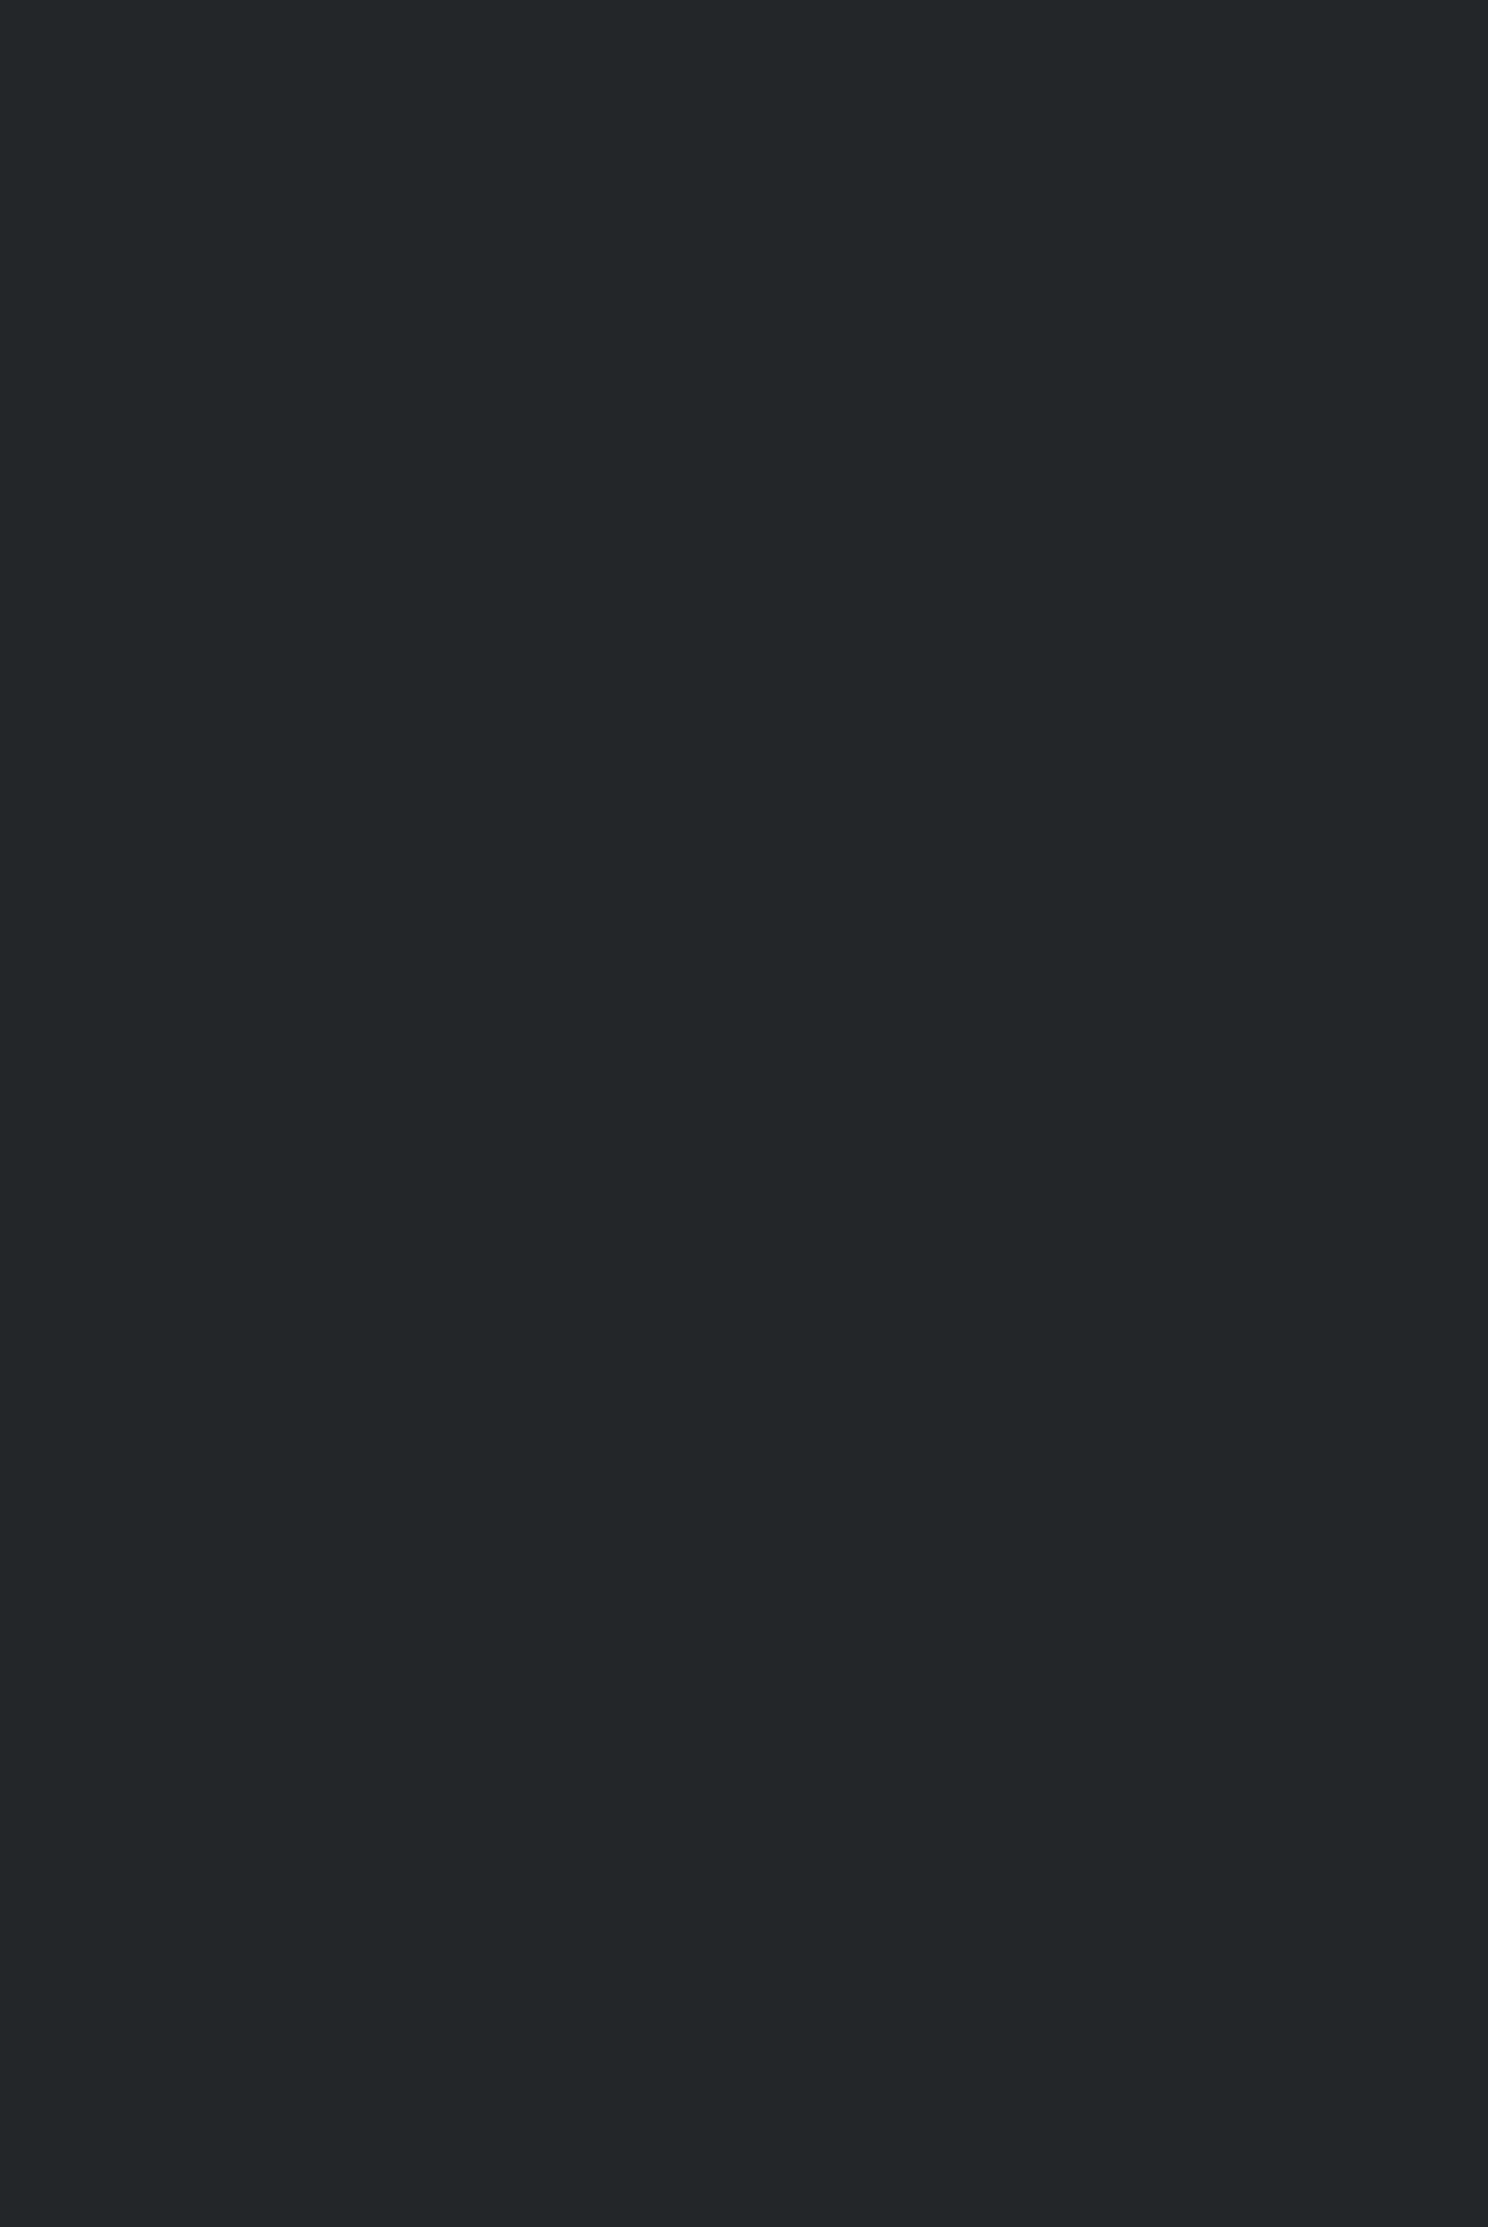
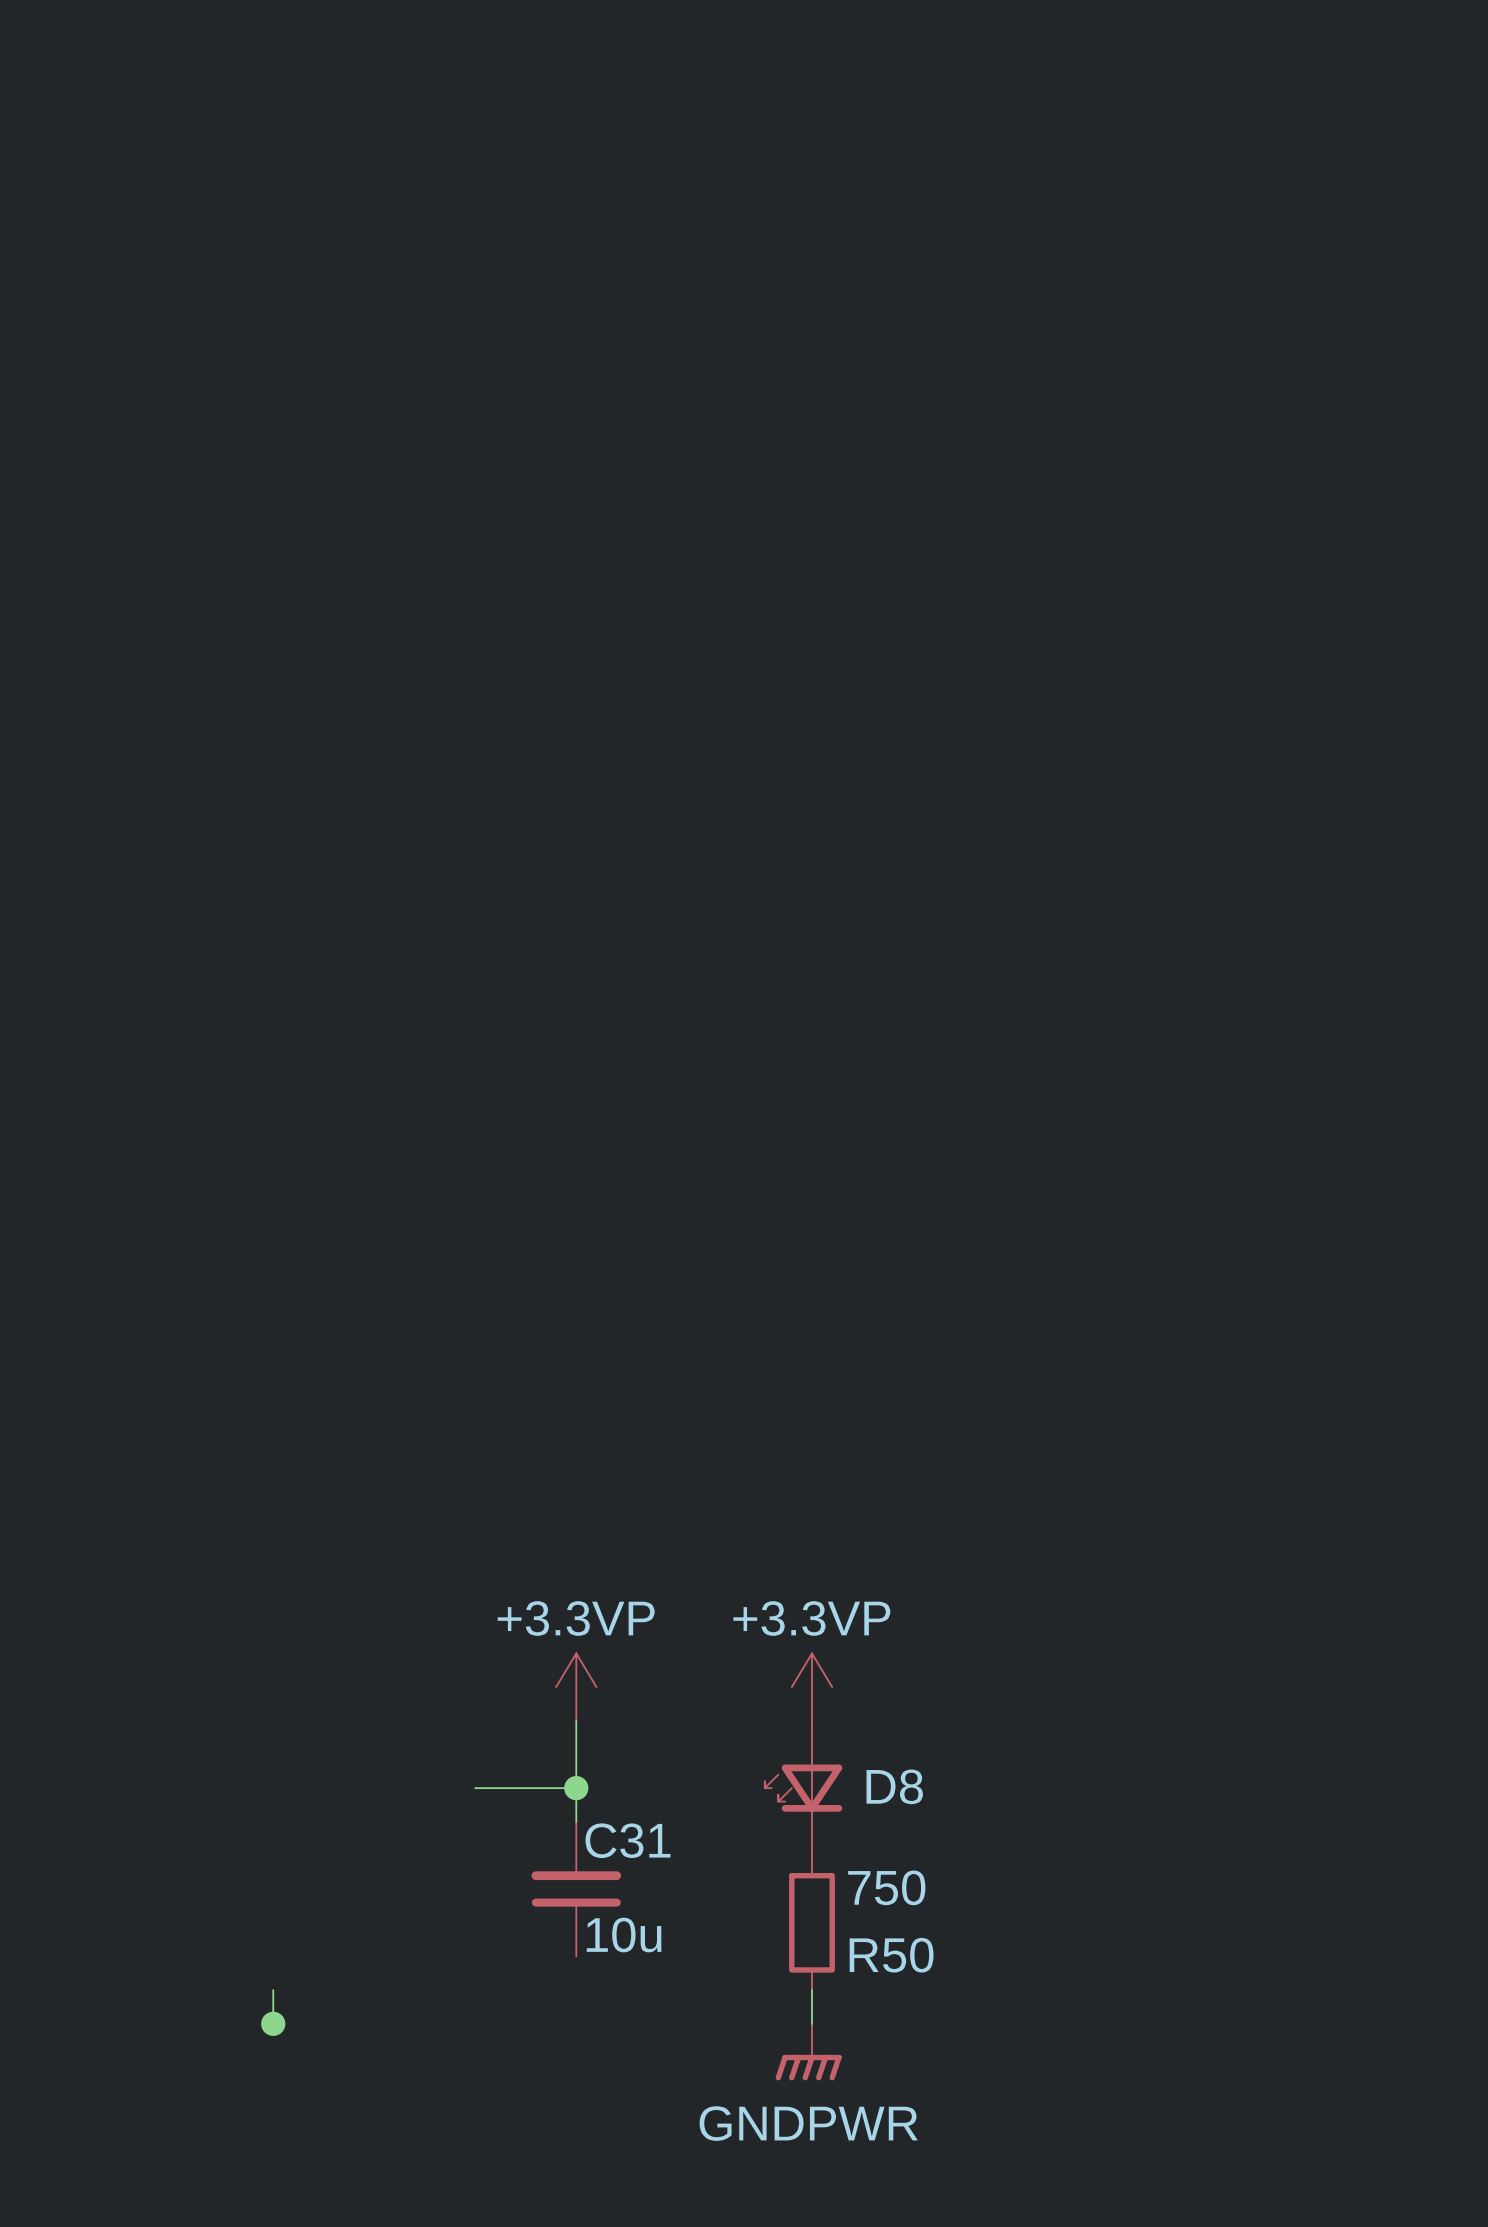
power symbol: none -> +3.3VP (576, 1687)
power symbol: none -> +3.3VP (811, 1687)
wire: none -> (576, 1720) (576, 1821)
wire: none -> (475, 1788) (576, 1788)
junction: none -> (576, 1788)
D8: none -> (803, 1788)
C31: none -> 10u (576, 1889)
R50: none -> 750 (811, 1922)
wire: none -> (273, 1990) (273, 2023)
wire: none -> (811, 1990) (811, 2023)
junction: none -> (273, 2023)
power symbol: none -> GNDPWR (808, 2052)

